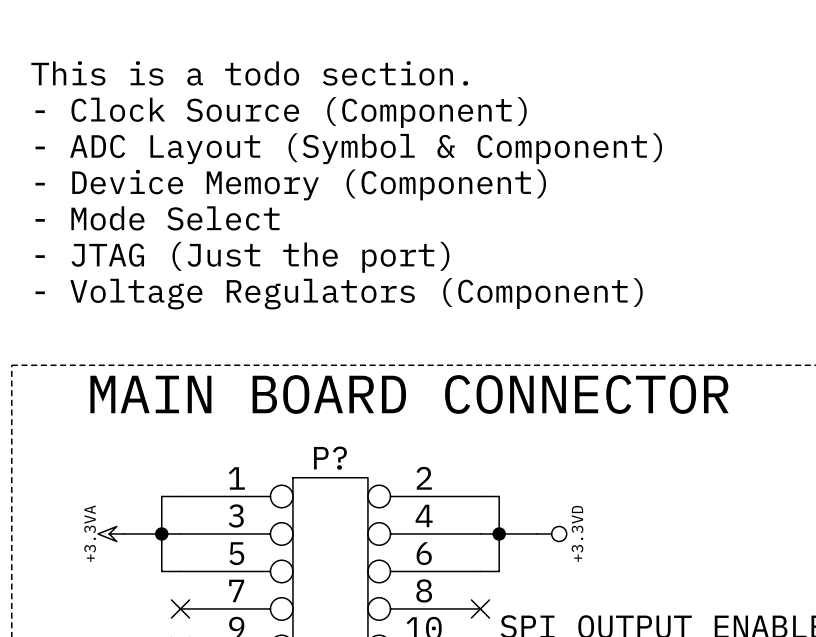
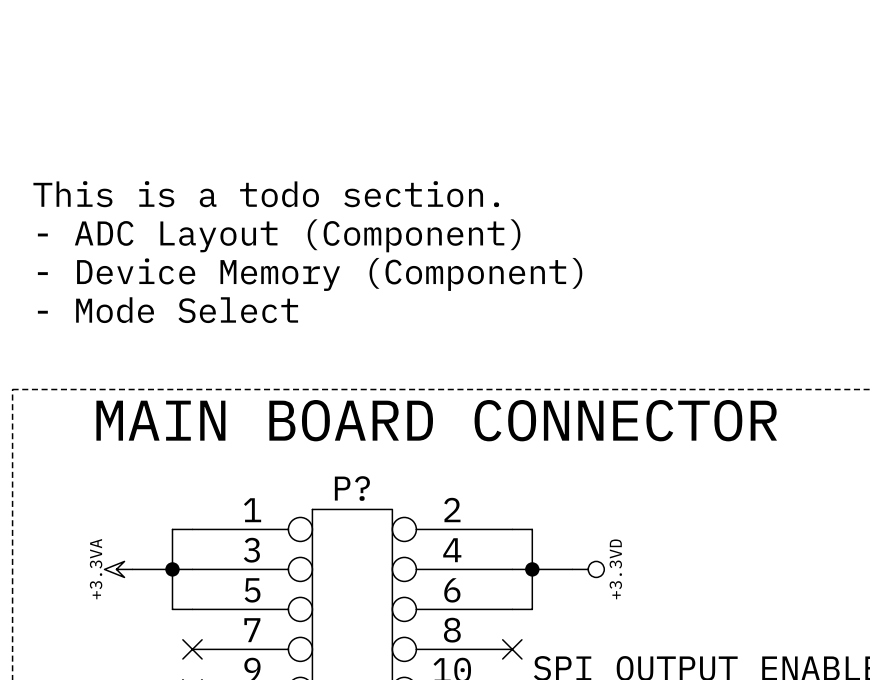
text: This is a todo section. (249, 73) -> none
text: - Clock Source (Component) (281, 112) -> none
text: - ADC Layout (Symbol & Component) (348, 148) -> none
text: - Device Memory (Component) (290, 184) -> This is a todo section. (266, 194)
text: - Mode Select (157, 218) -> - ADC Layout (Component) (279, 235)
text: - JTAG (Just the port) (242, 257) -> - Device Memory (Component) (310, 274)
text: - Voltage Regulators (Component) (339, 293) -> - Mode Select (167, 310)

